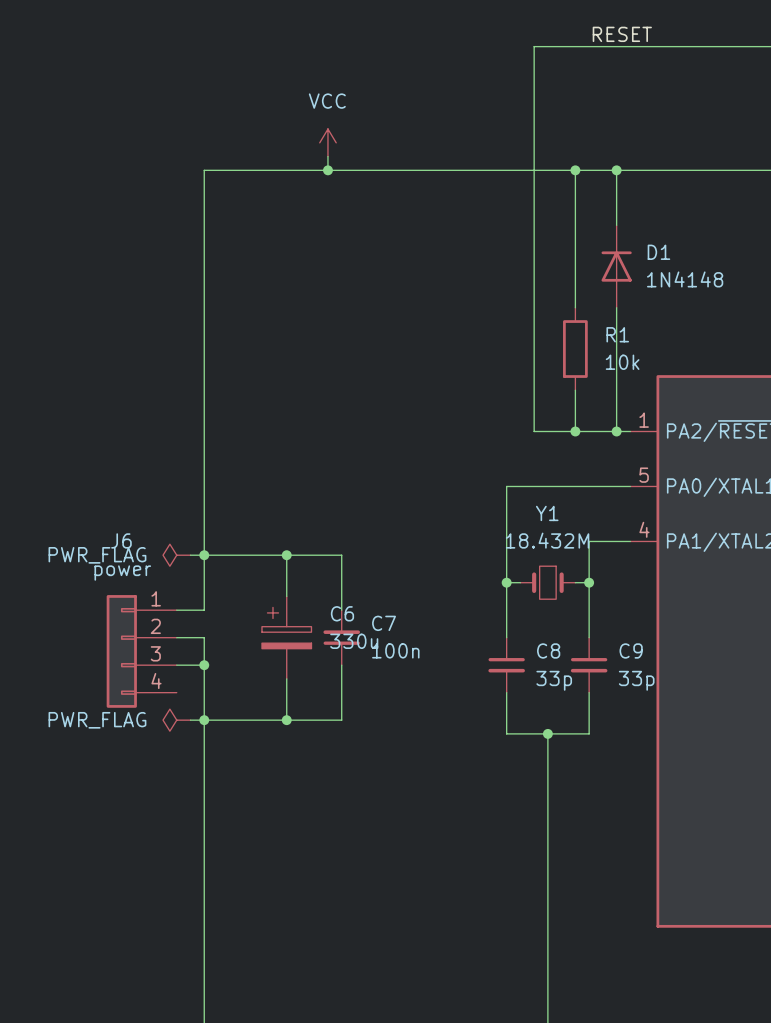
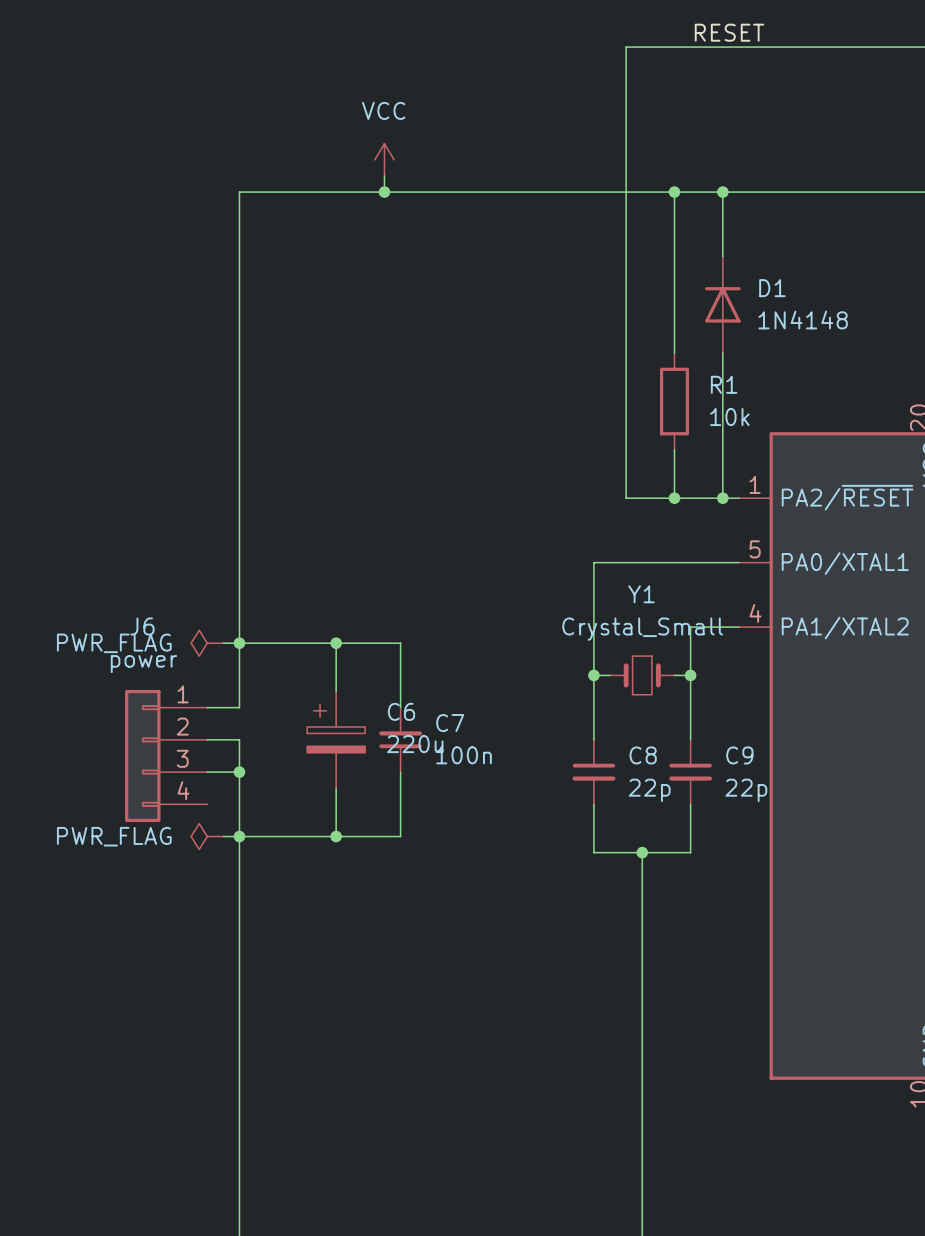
Y1 value: 18.432M (547, 540) -> Crystal_Small (642, 629)
C6 value: 330u (354, 641) -> 220u (415, 744)
C8 value: 33p (554, 680) -> 22p (649, 790)
C9 value: 33p (636, 680) -> 22p (746, 790)

